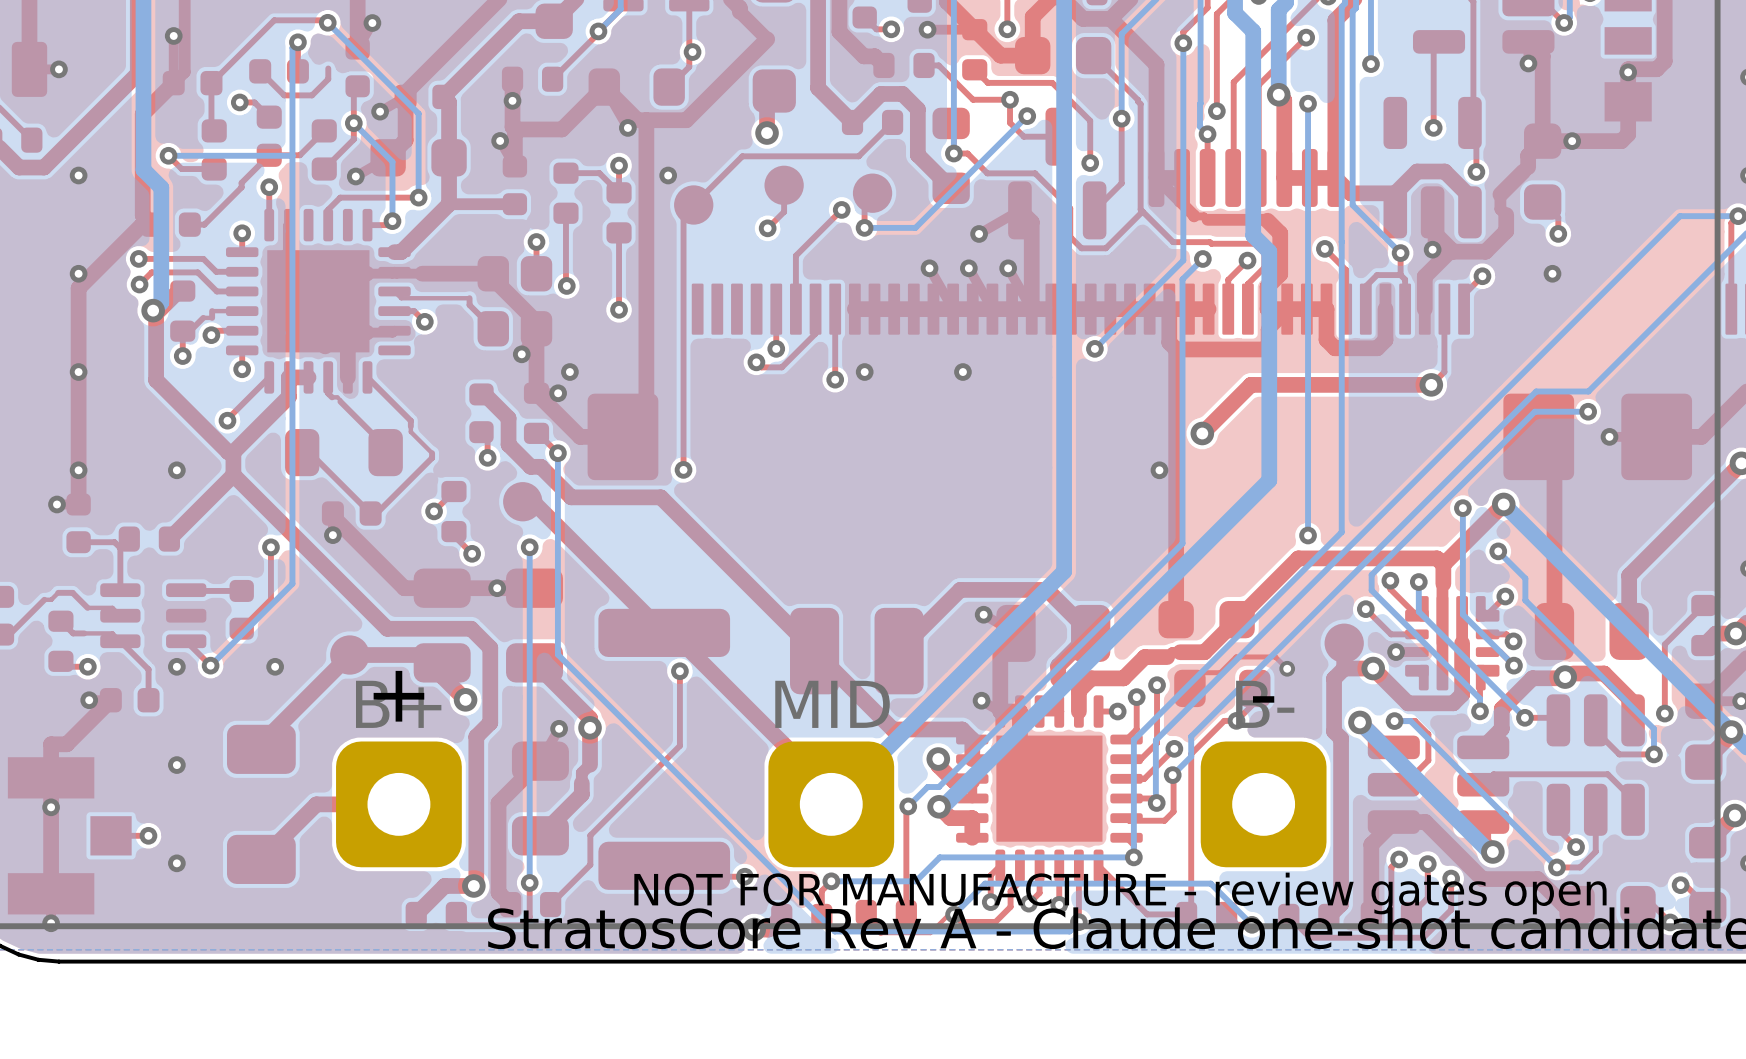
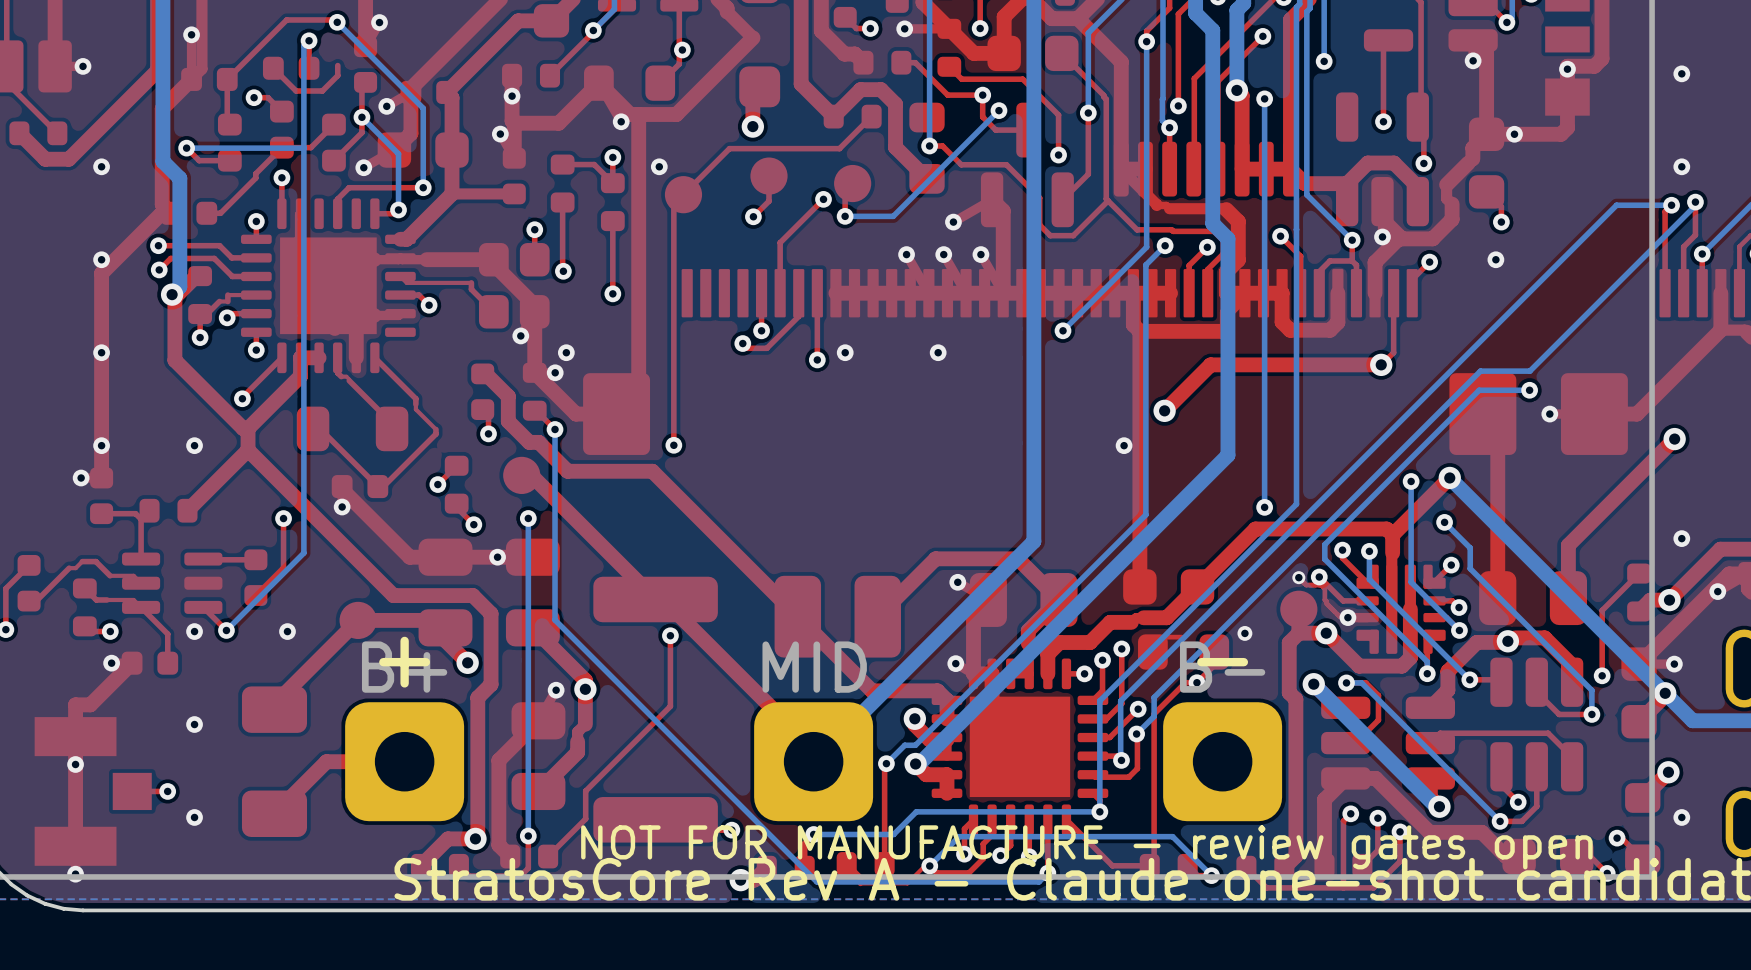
top track: none -> (1298, 577) (1306, 585) (1321, 585) (1324, 588) (1326, 603) (1339, 616) (1367, 616)
via: none -> (1298, 577)
top track: (1287, 668) (1275, 656) (1236, 656) (1220, 672) -> none

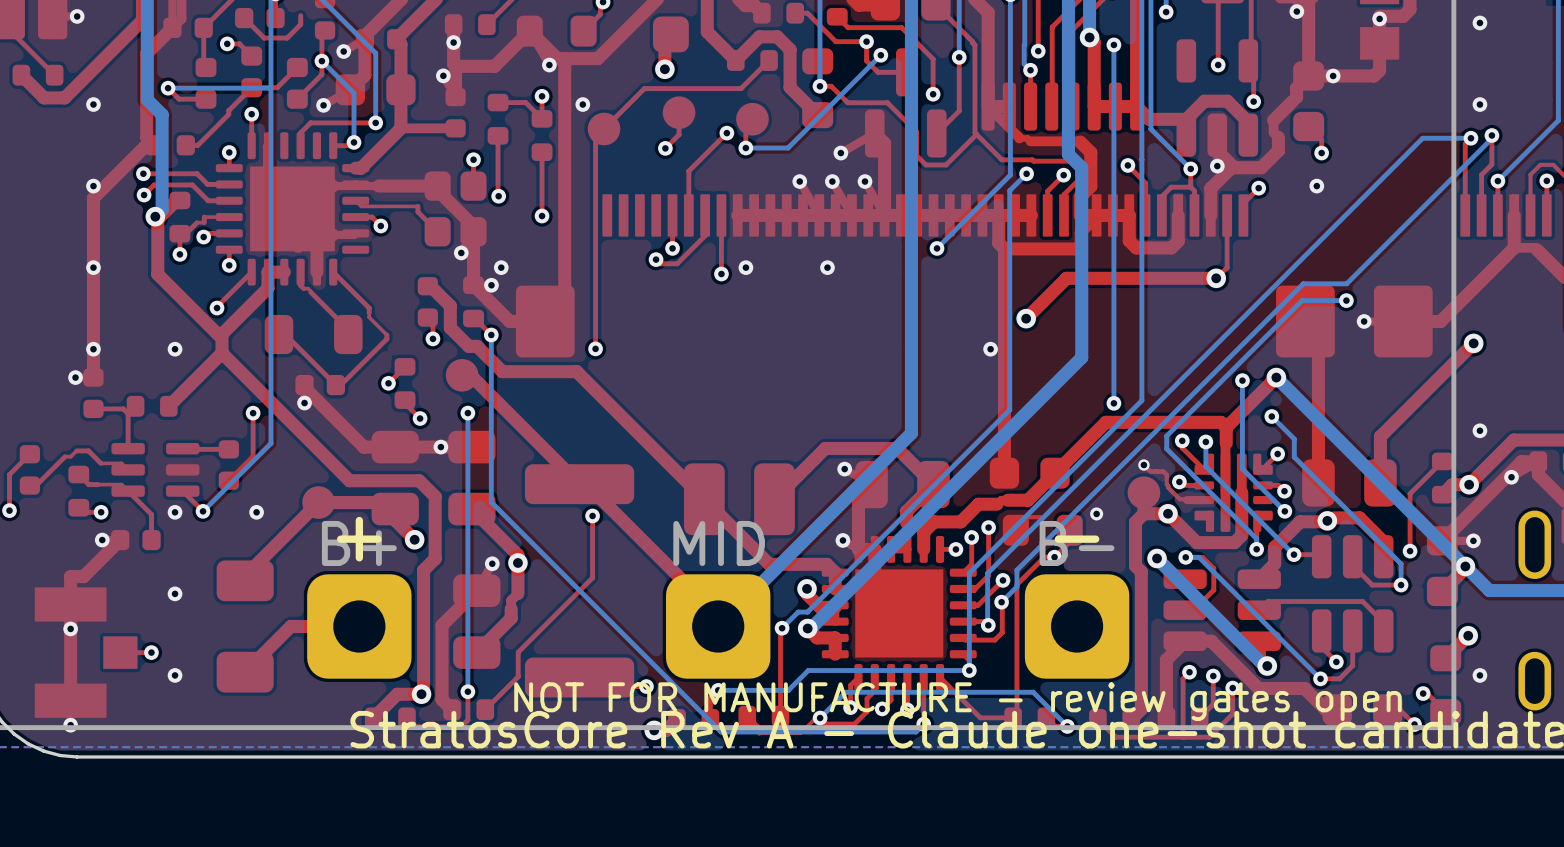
via: (1319, 577) -> none
via: none -> (1179, 481)
via: (1347, 617) -> none

